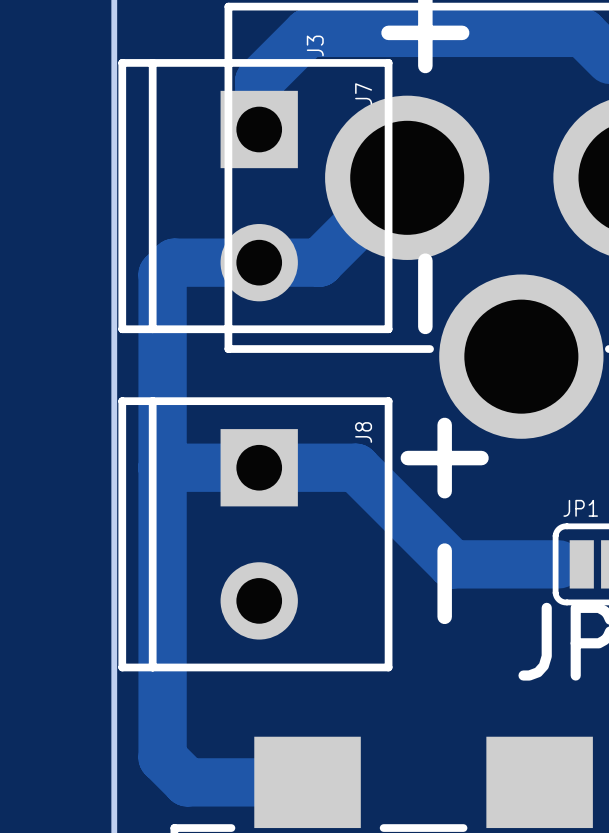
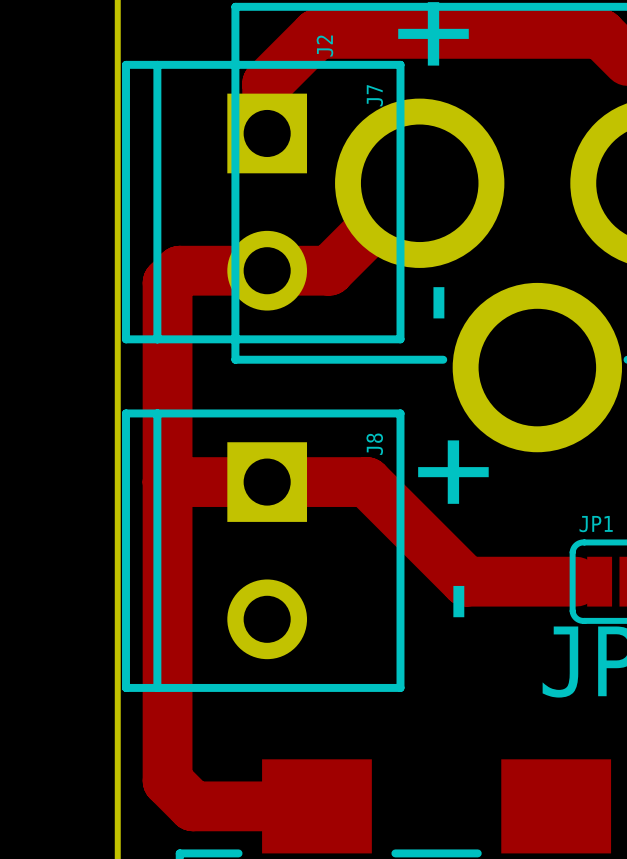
J3 name: J3 (315, 45) -> J2 (324, 46)

